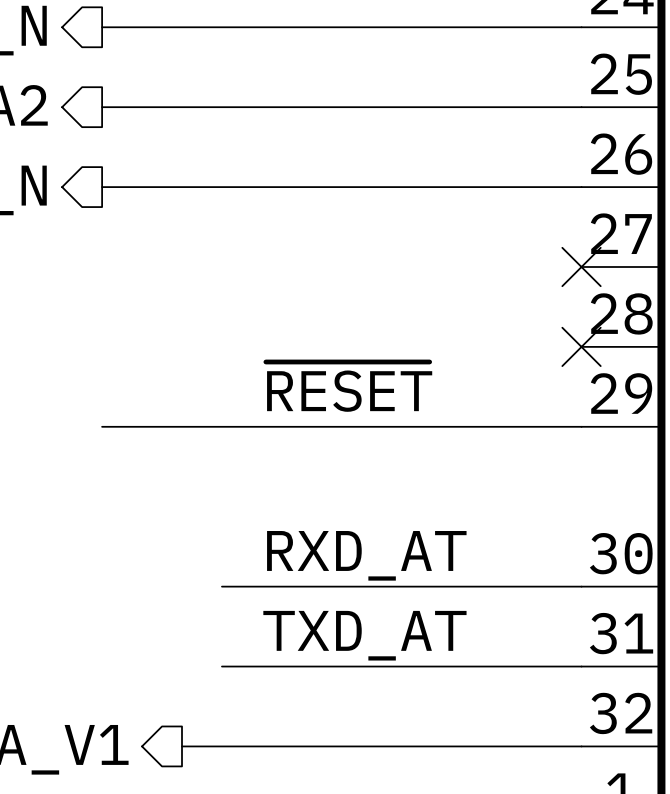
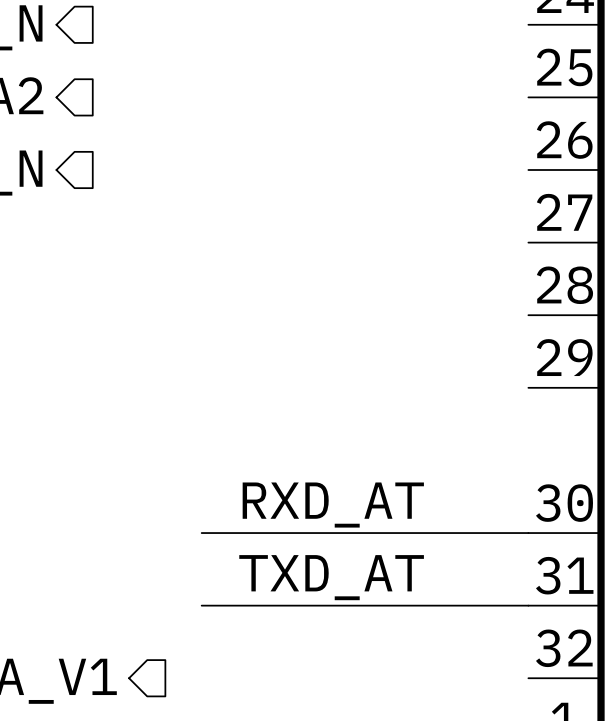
wire: (102, 27) (581, 27) -> none
wire: (102, 107) (581, 107) -> none
wire: (102, 187) (581, 187) -> none
no-connect mark: (581, 266) -> none
no-connect mark: (581, 346) -> none
label: ~{RESET} (349, 386) -> none
wire: (102, 426) (581, 426) -> none
wire: (182, 746) (581, 746) -> none

